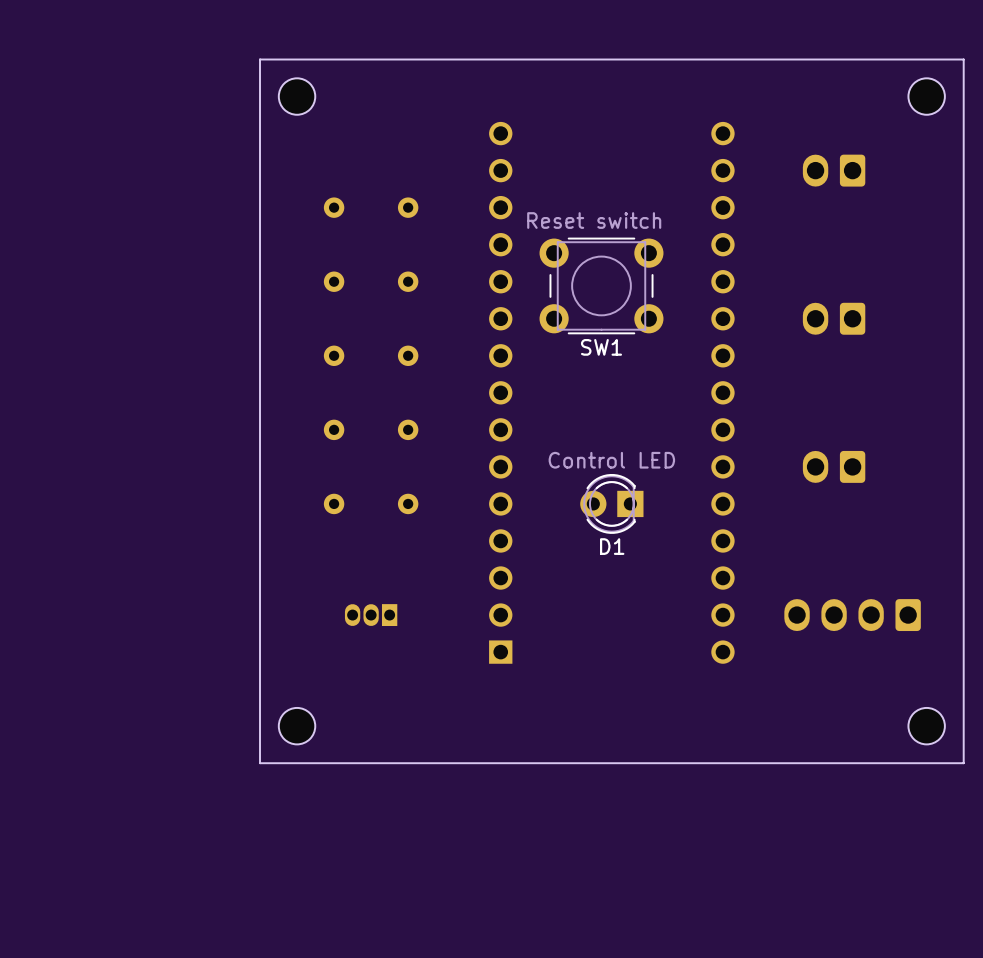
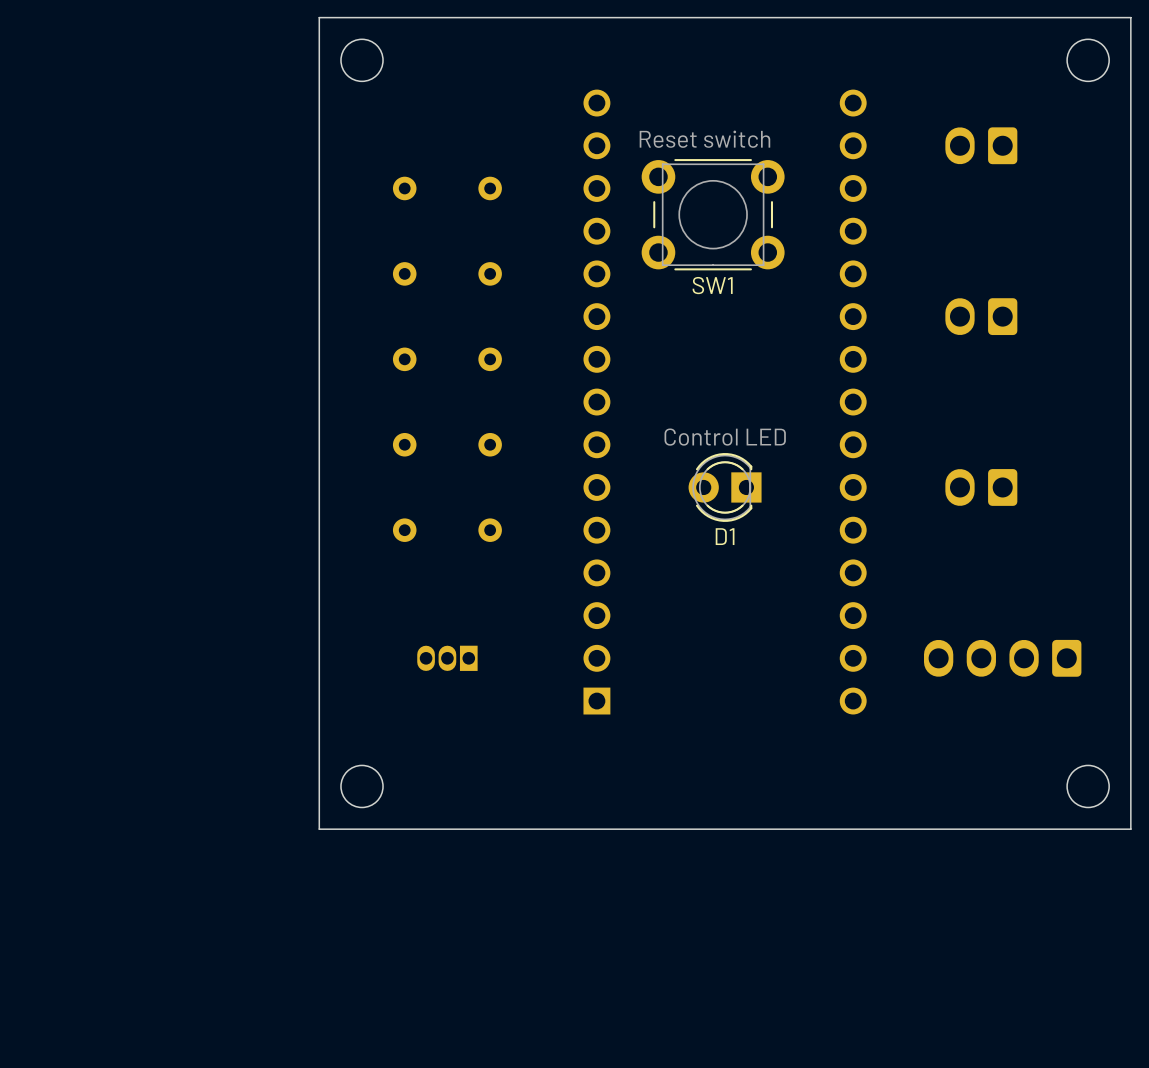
SW1 position: (601, 285) -> (713, 214)
D1 position: (611, 503) -> (725, 487)

